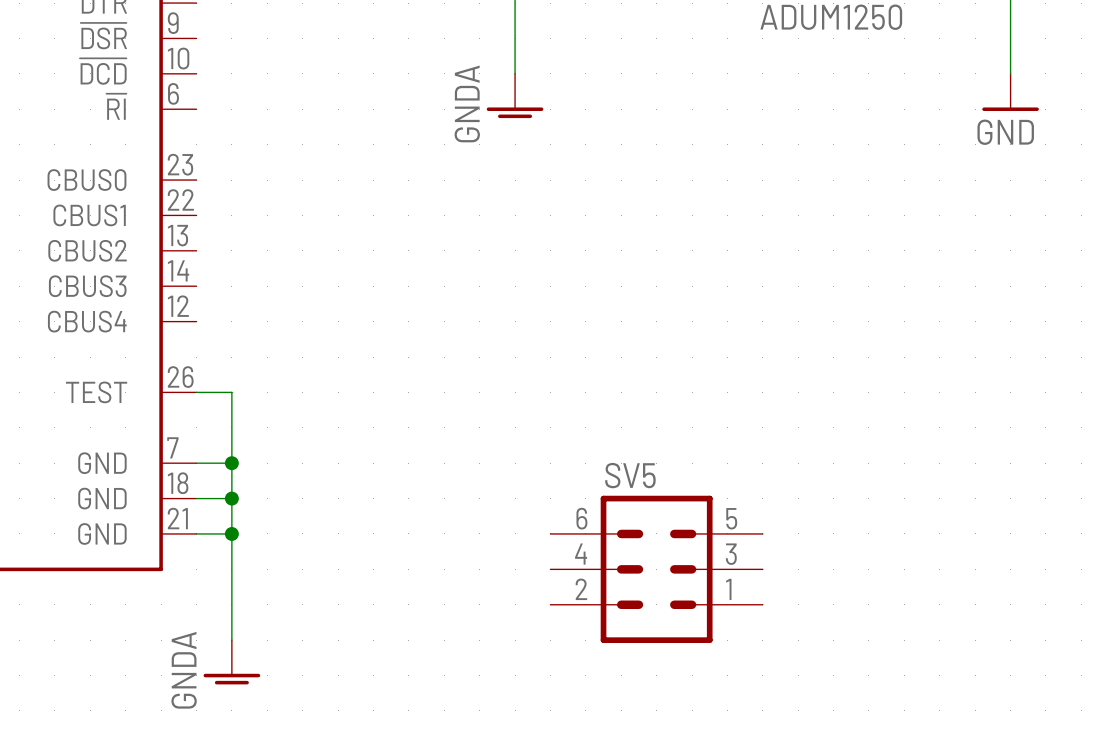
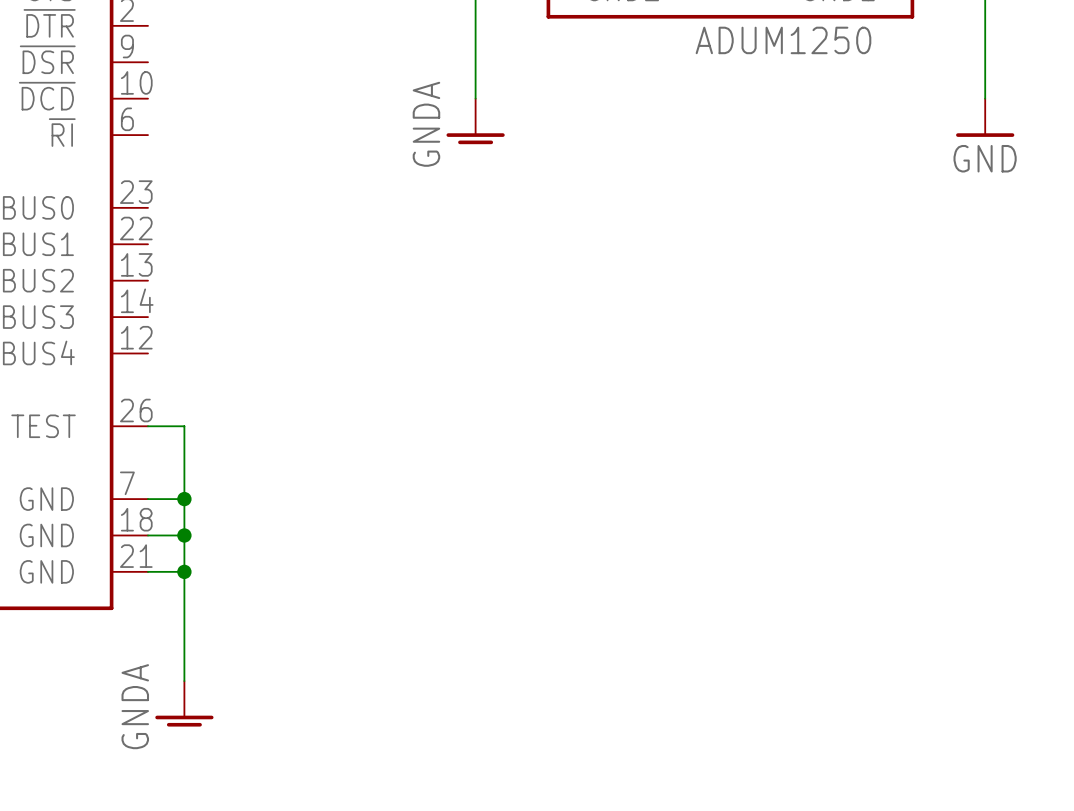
SV5: (656, 569) -> none

